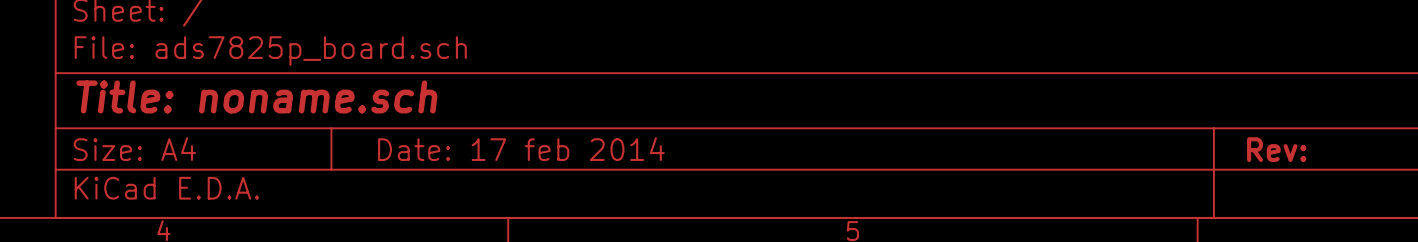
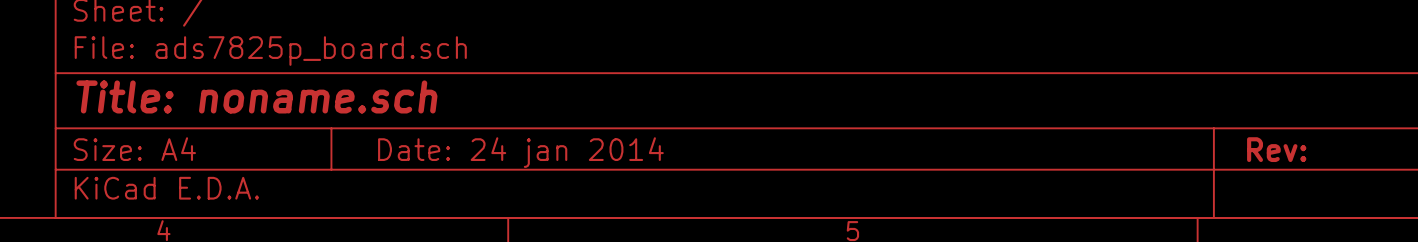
title block: Date: 17 feb 2014 (521, 149) -> Date: 24 jan 2014 (520, 152)

